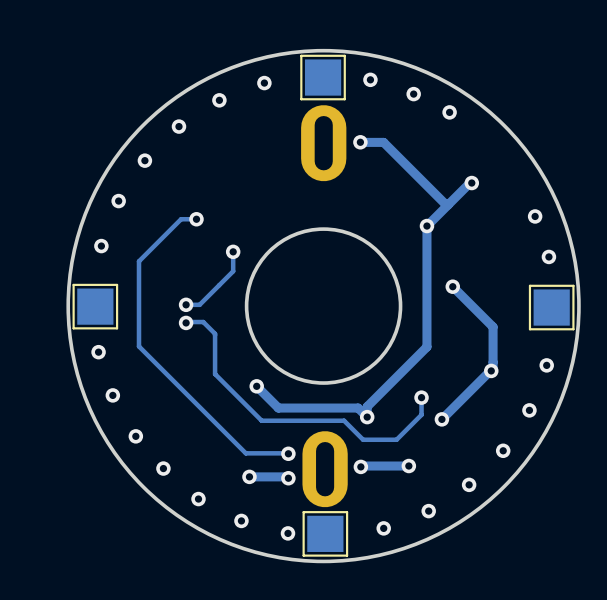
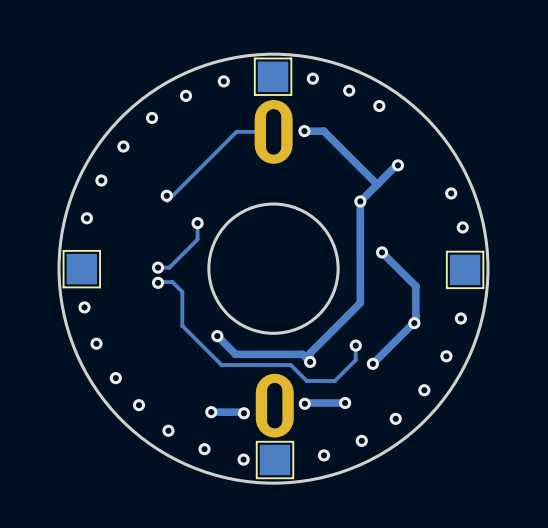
track: none -> (273, 131) (236, 131) (167, 201)
track: (196, 219) (181, 219) (139, 261) (139, 346) (245, 453) (288, 453) -> none
via: (288, 453) -> none

